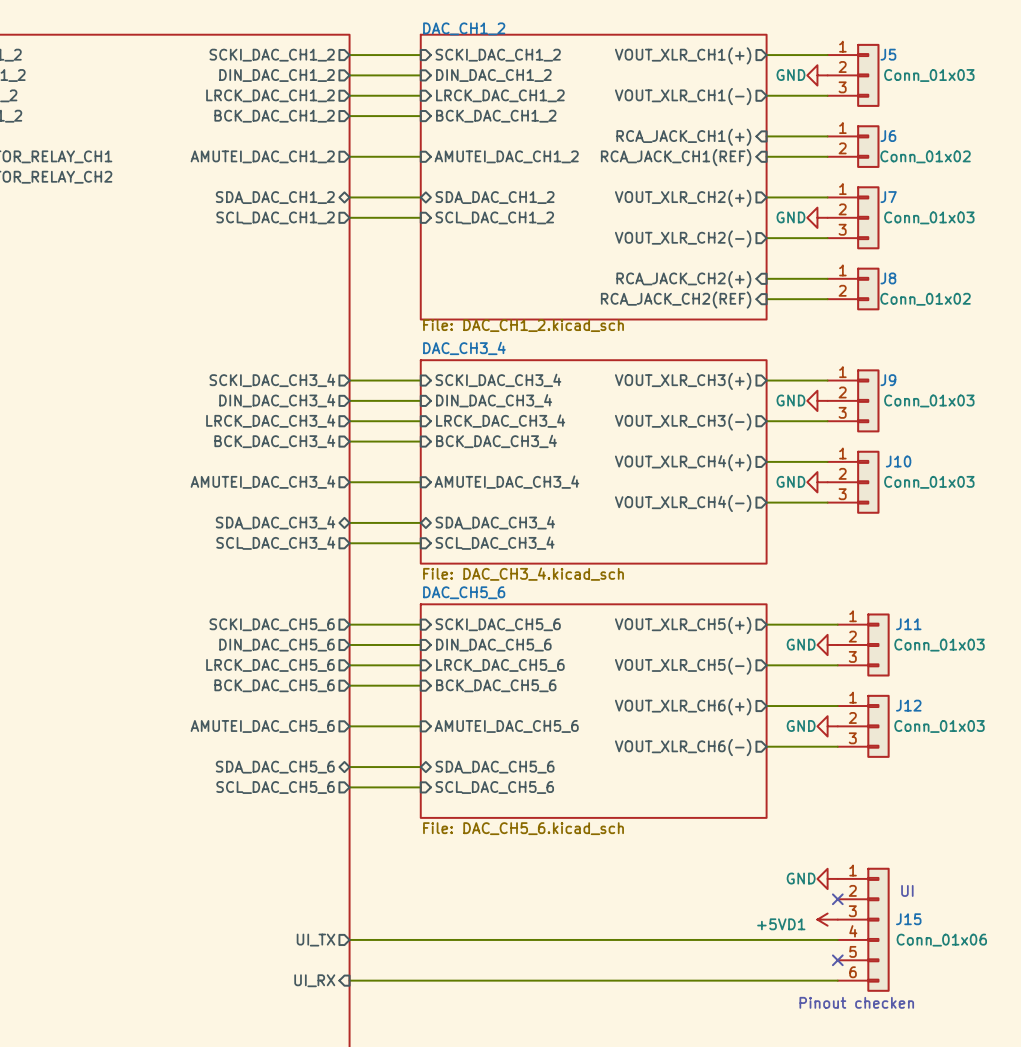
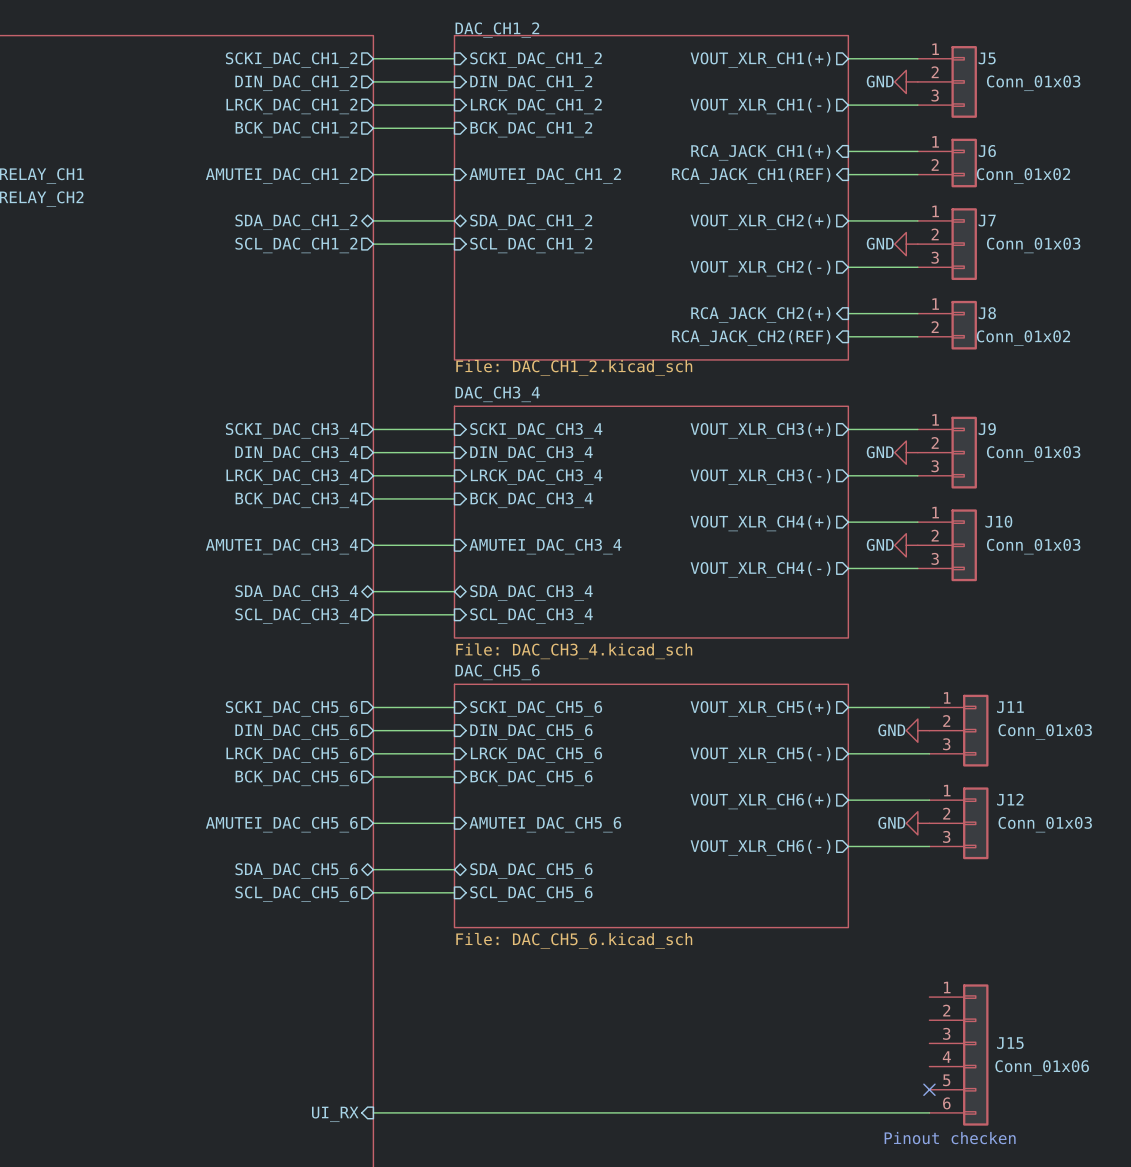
power symbol: GND (827, 878) -> none
text: UI (907, 890) -> none
no-connect mark: (837, 899) -> none
power symbol: +5VD1 (827, 919) -> none
wire: (349, 939) (837, 939) -> none
sheet pin: UI_TX (315, 940) -> none

